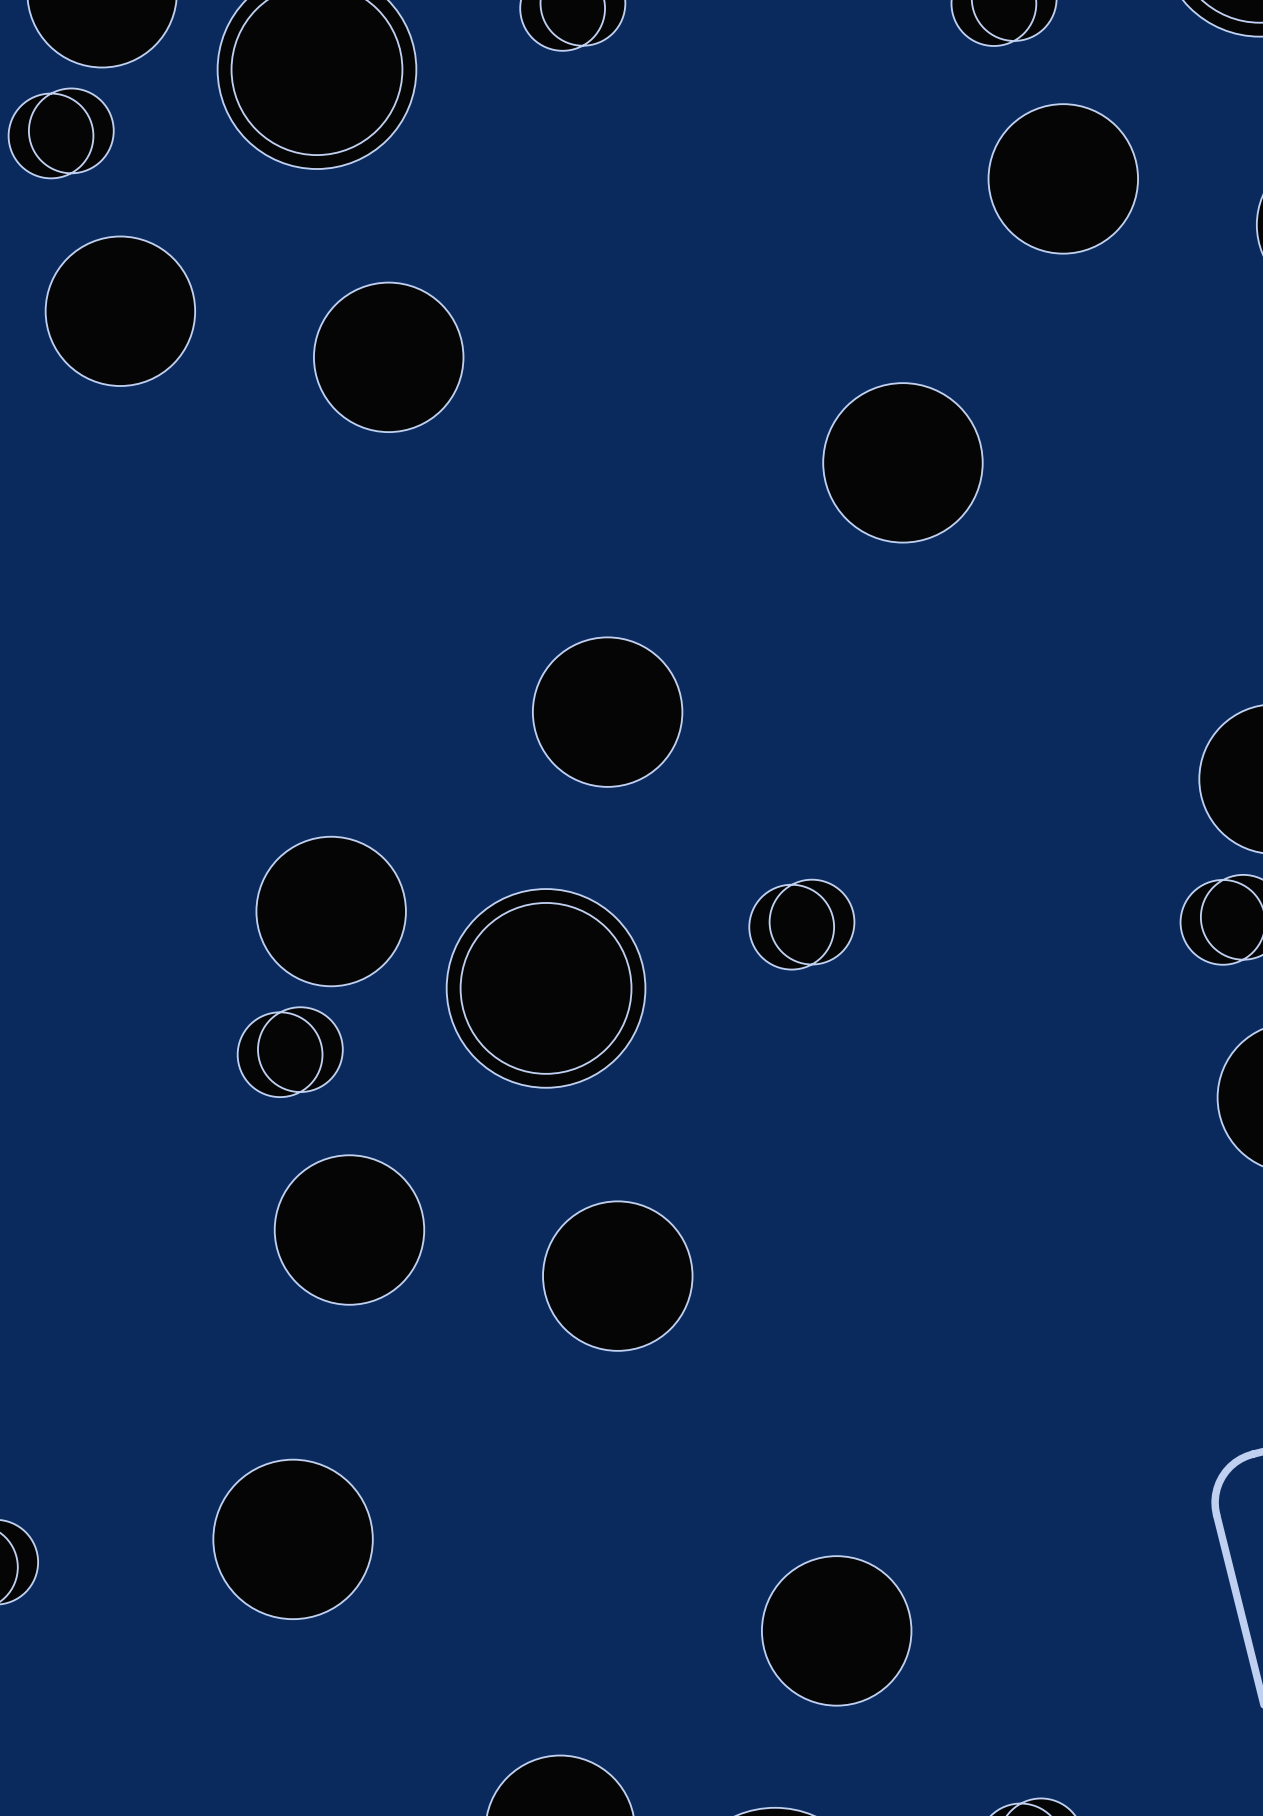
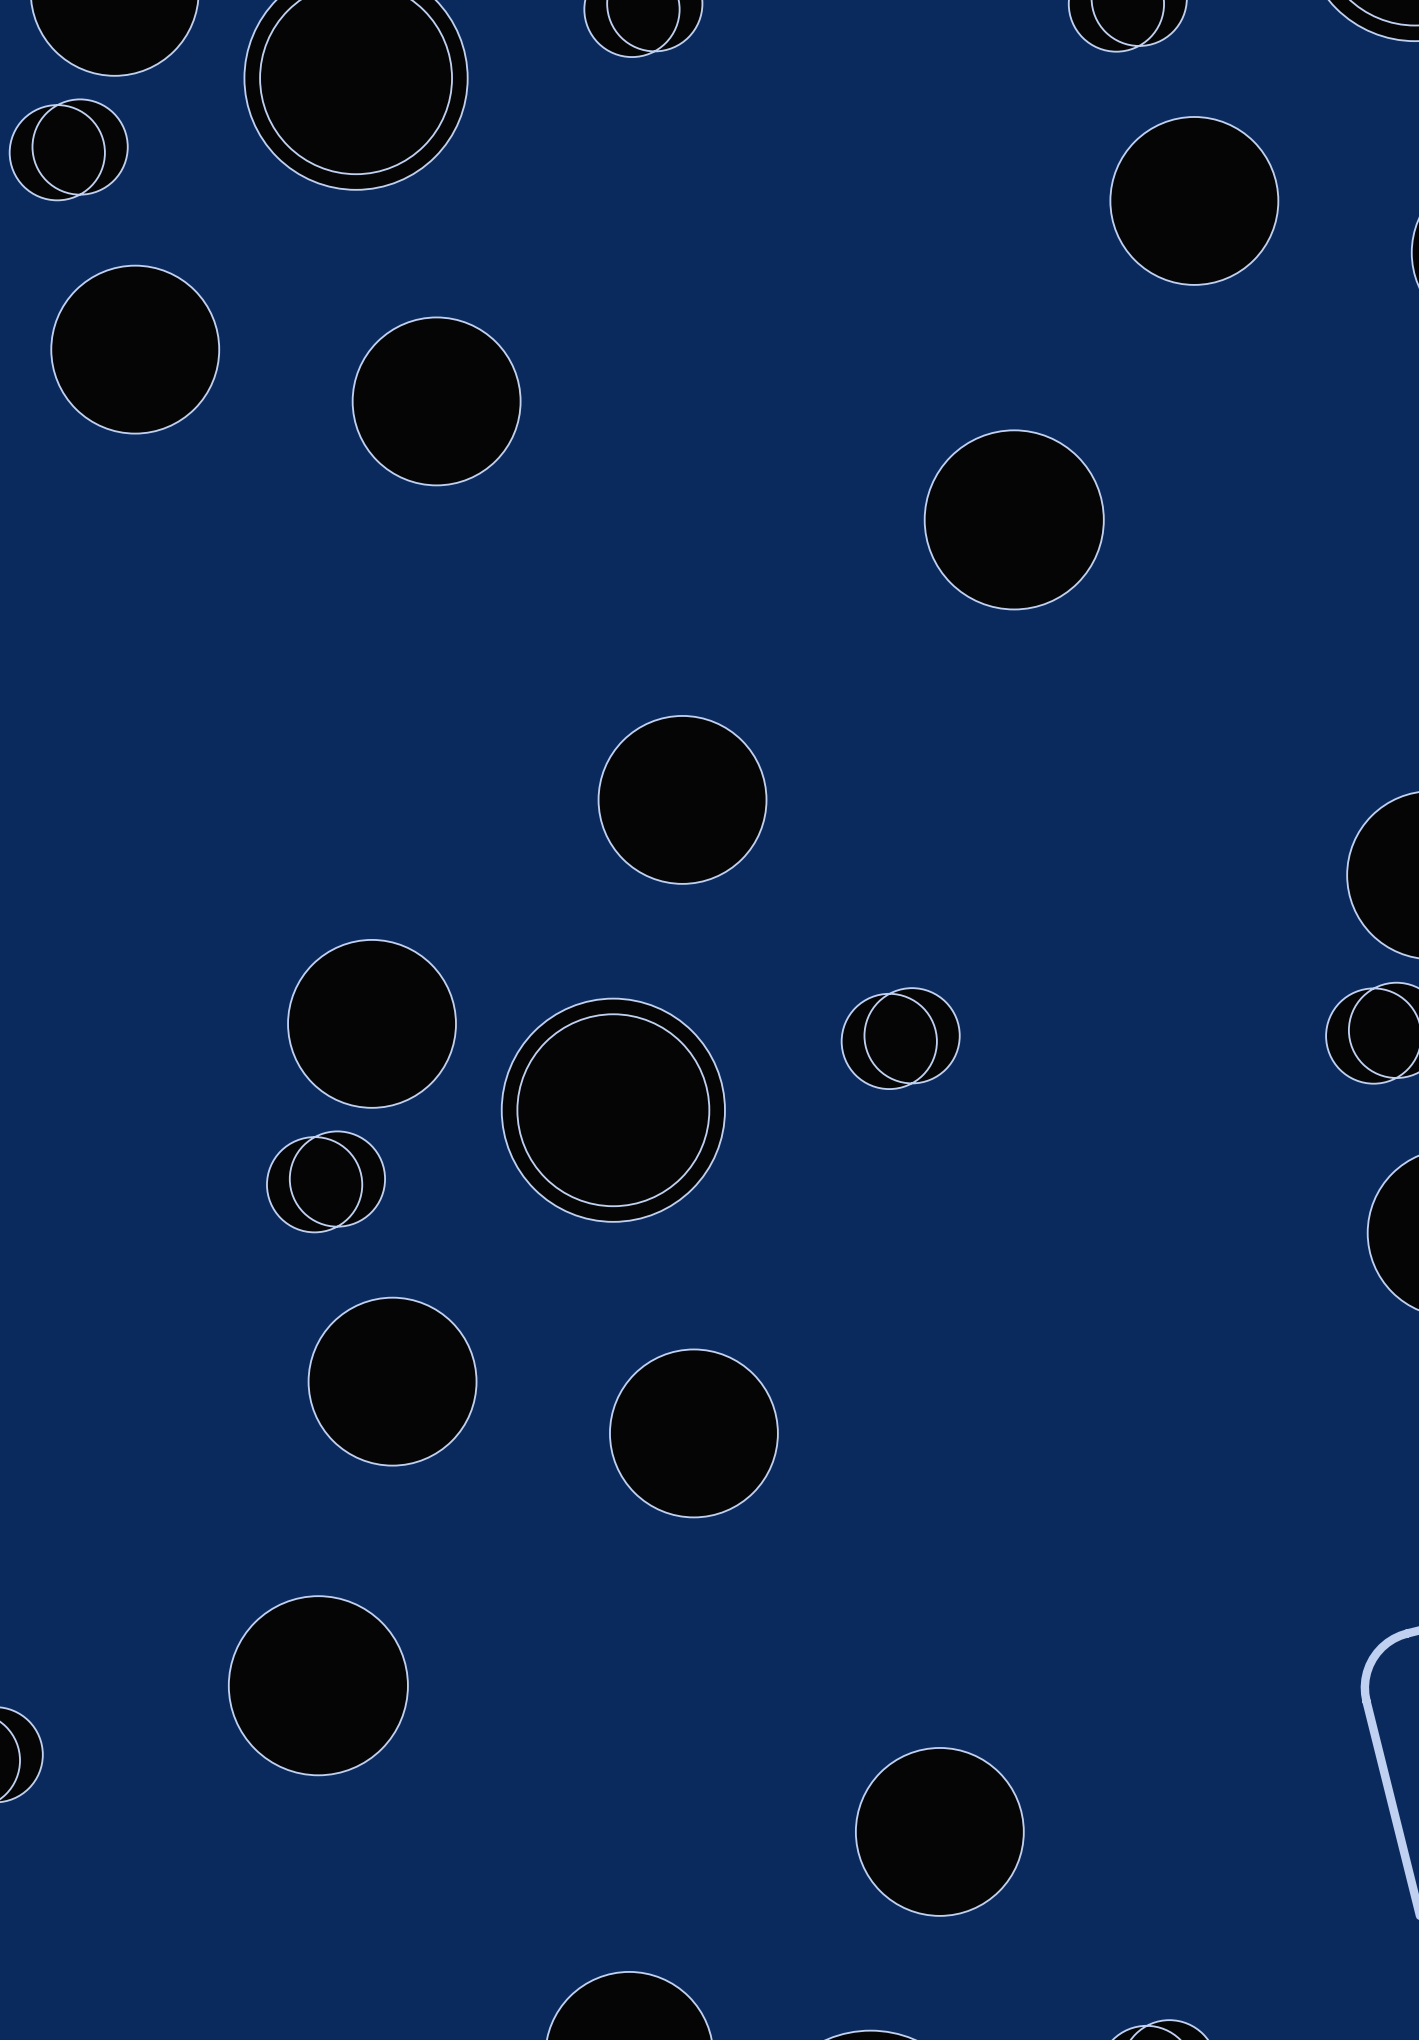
part position: (293, 1539) -> (318, 1685)

